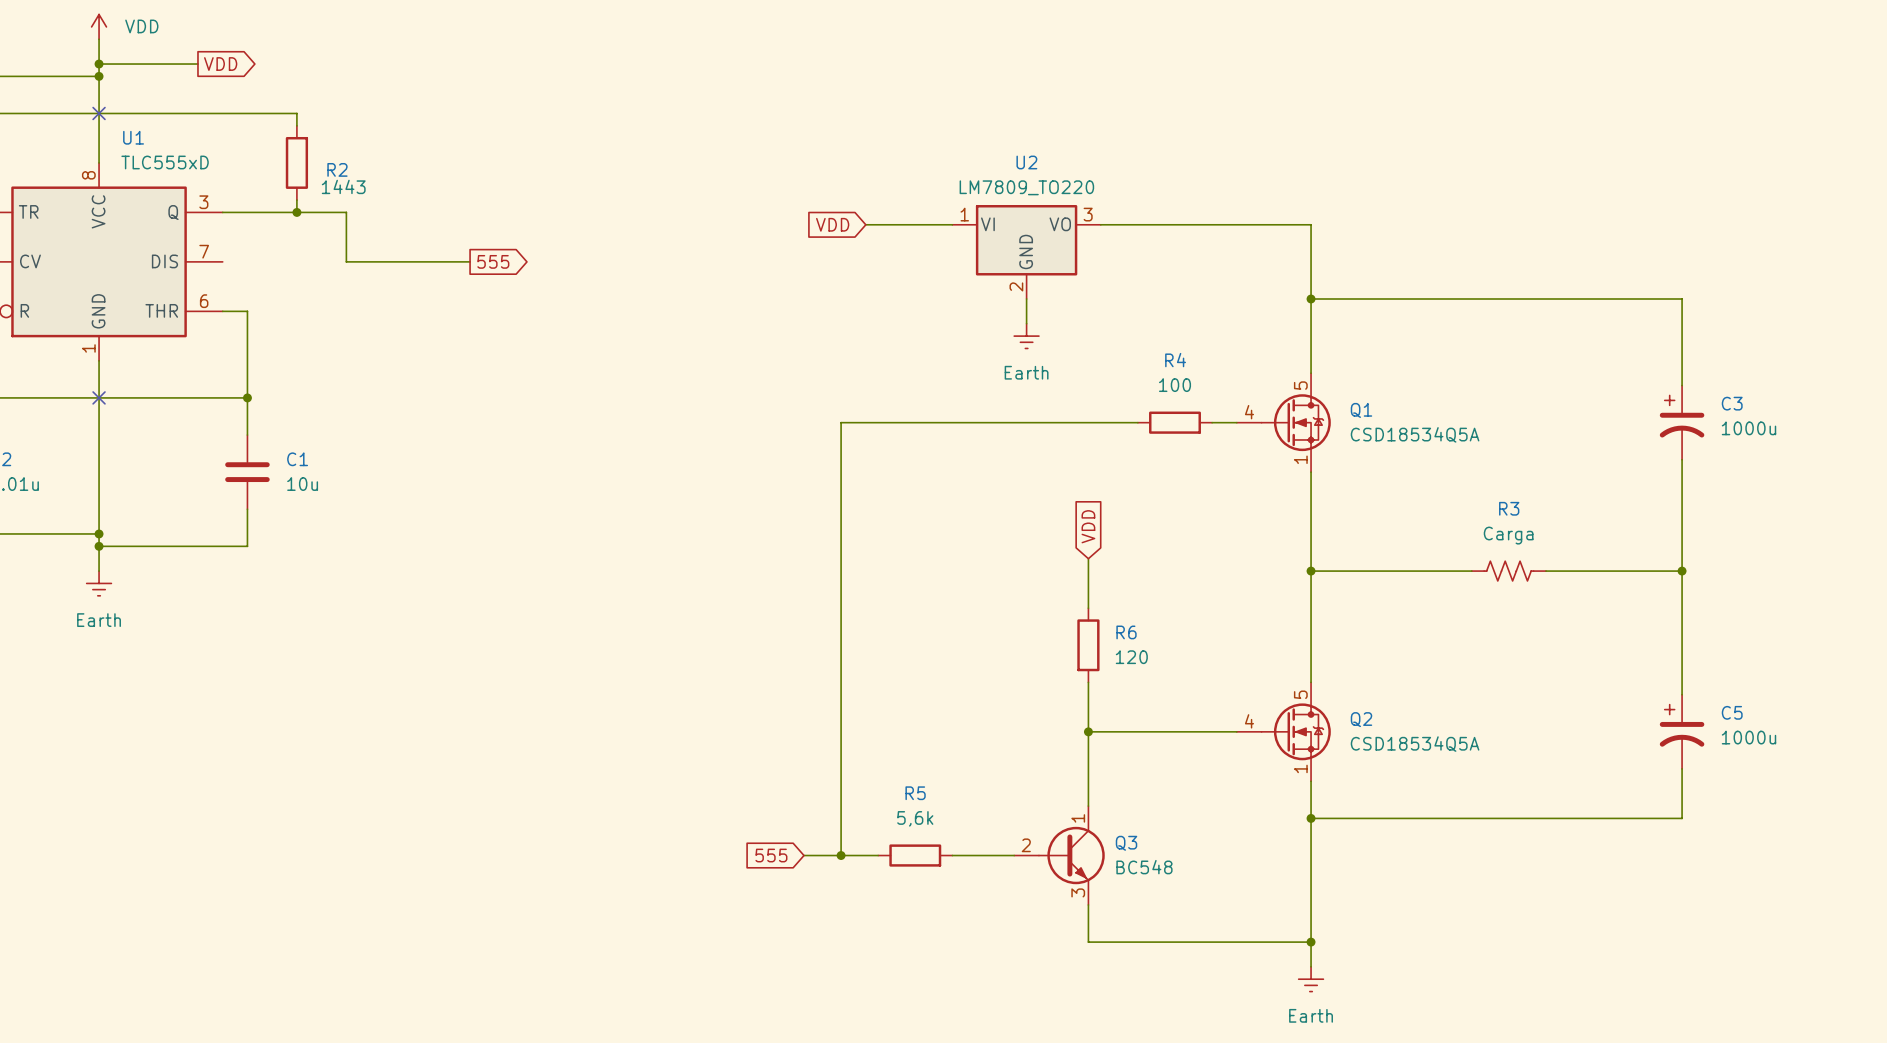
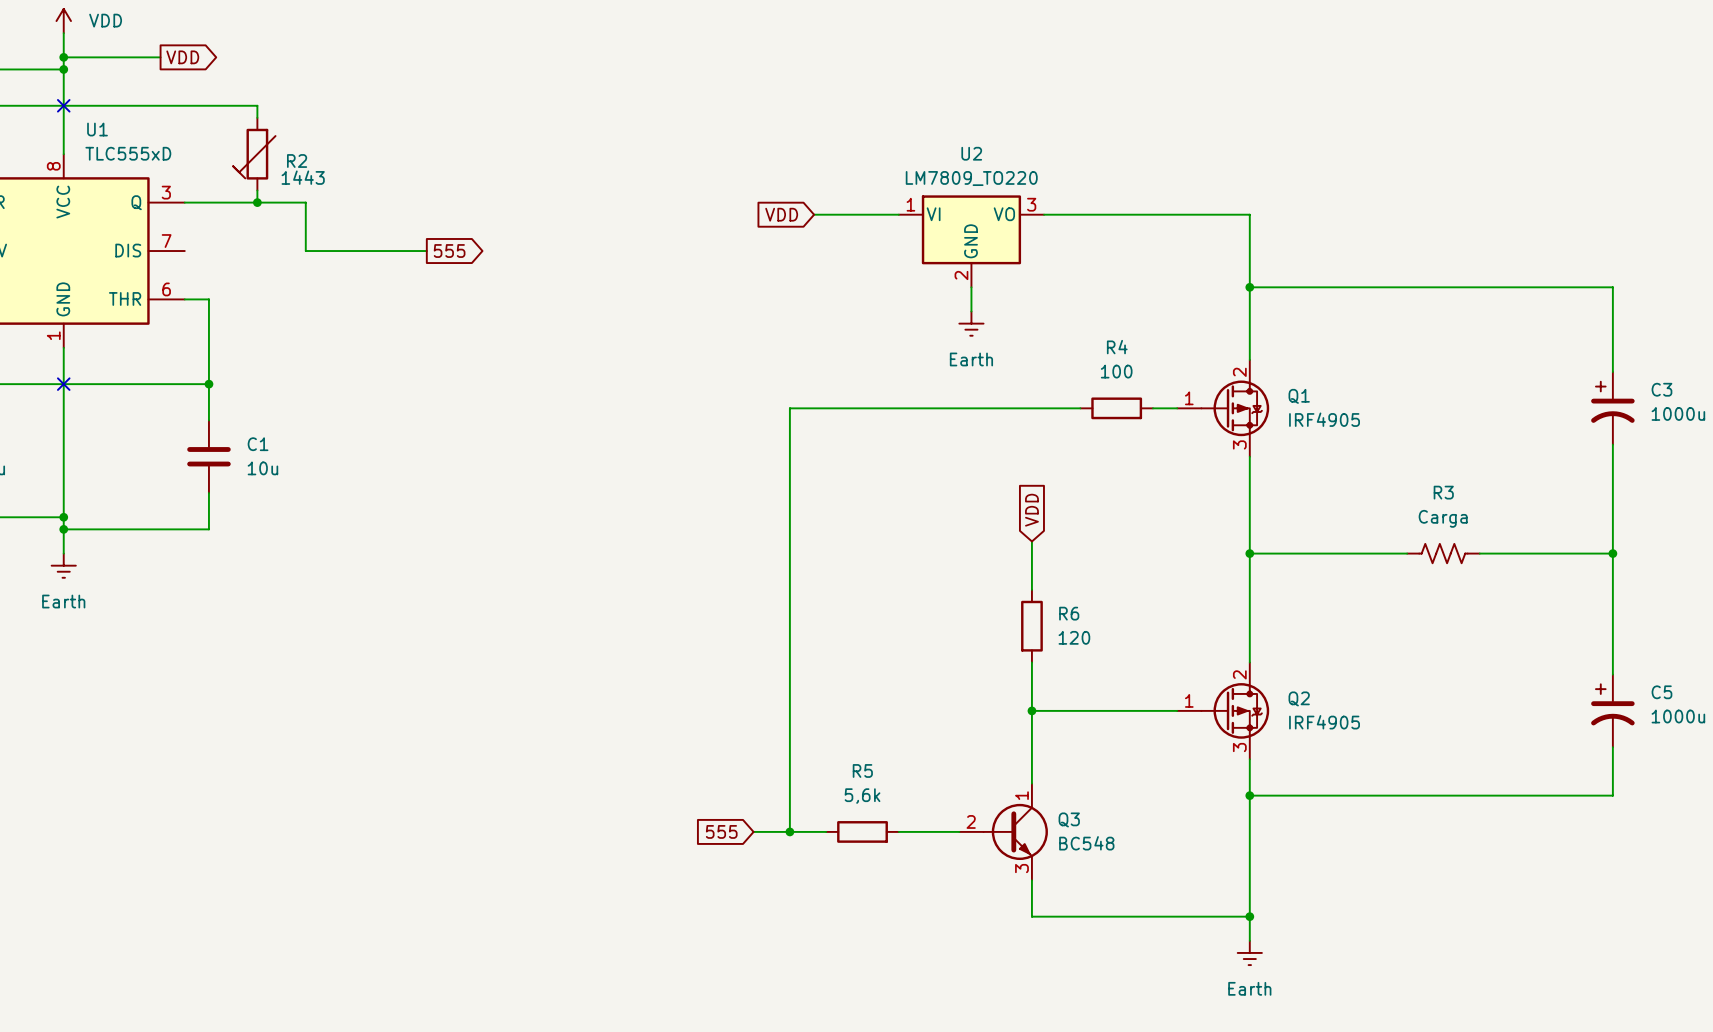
R2 symbol: [285, 125, 309, 201] -> [233, 117, 276, 191]
Q1 symbol: [1236, 373, 1331, 473] -> [1177, 359, 1270, 457]
Q1 value: CSD18534Q5A (1415, 434) -> IRF4905 (1324, 419)
Q2 symbol: [1236, 682, 1331, 782] -> [1177, 662, 1270, 760]
Q2 value: CSD18534Q5A (1415, 744) -> IRF4905 (1324, 722)

